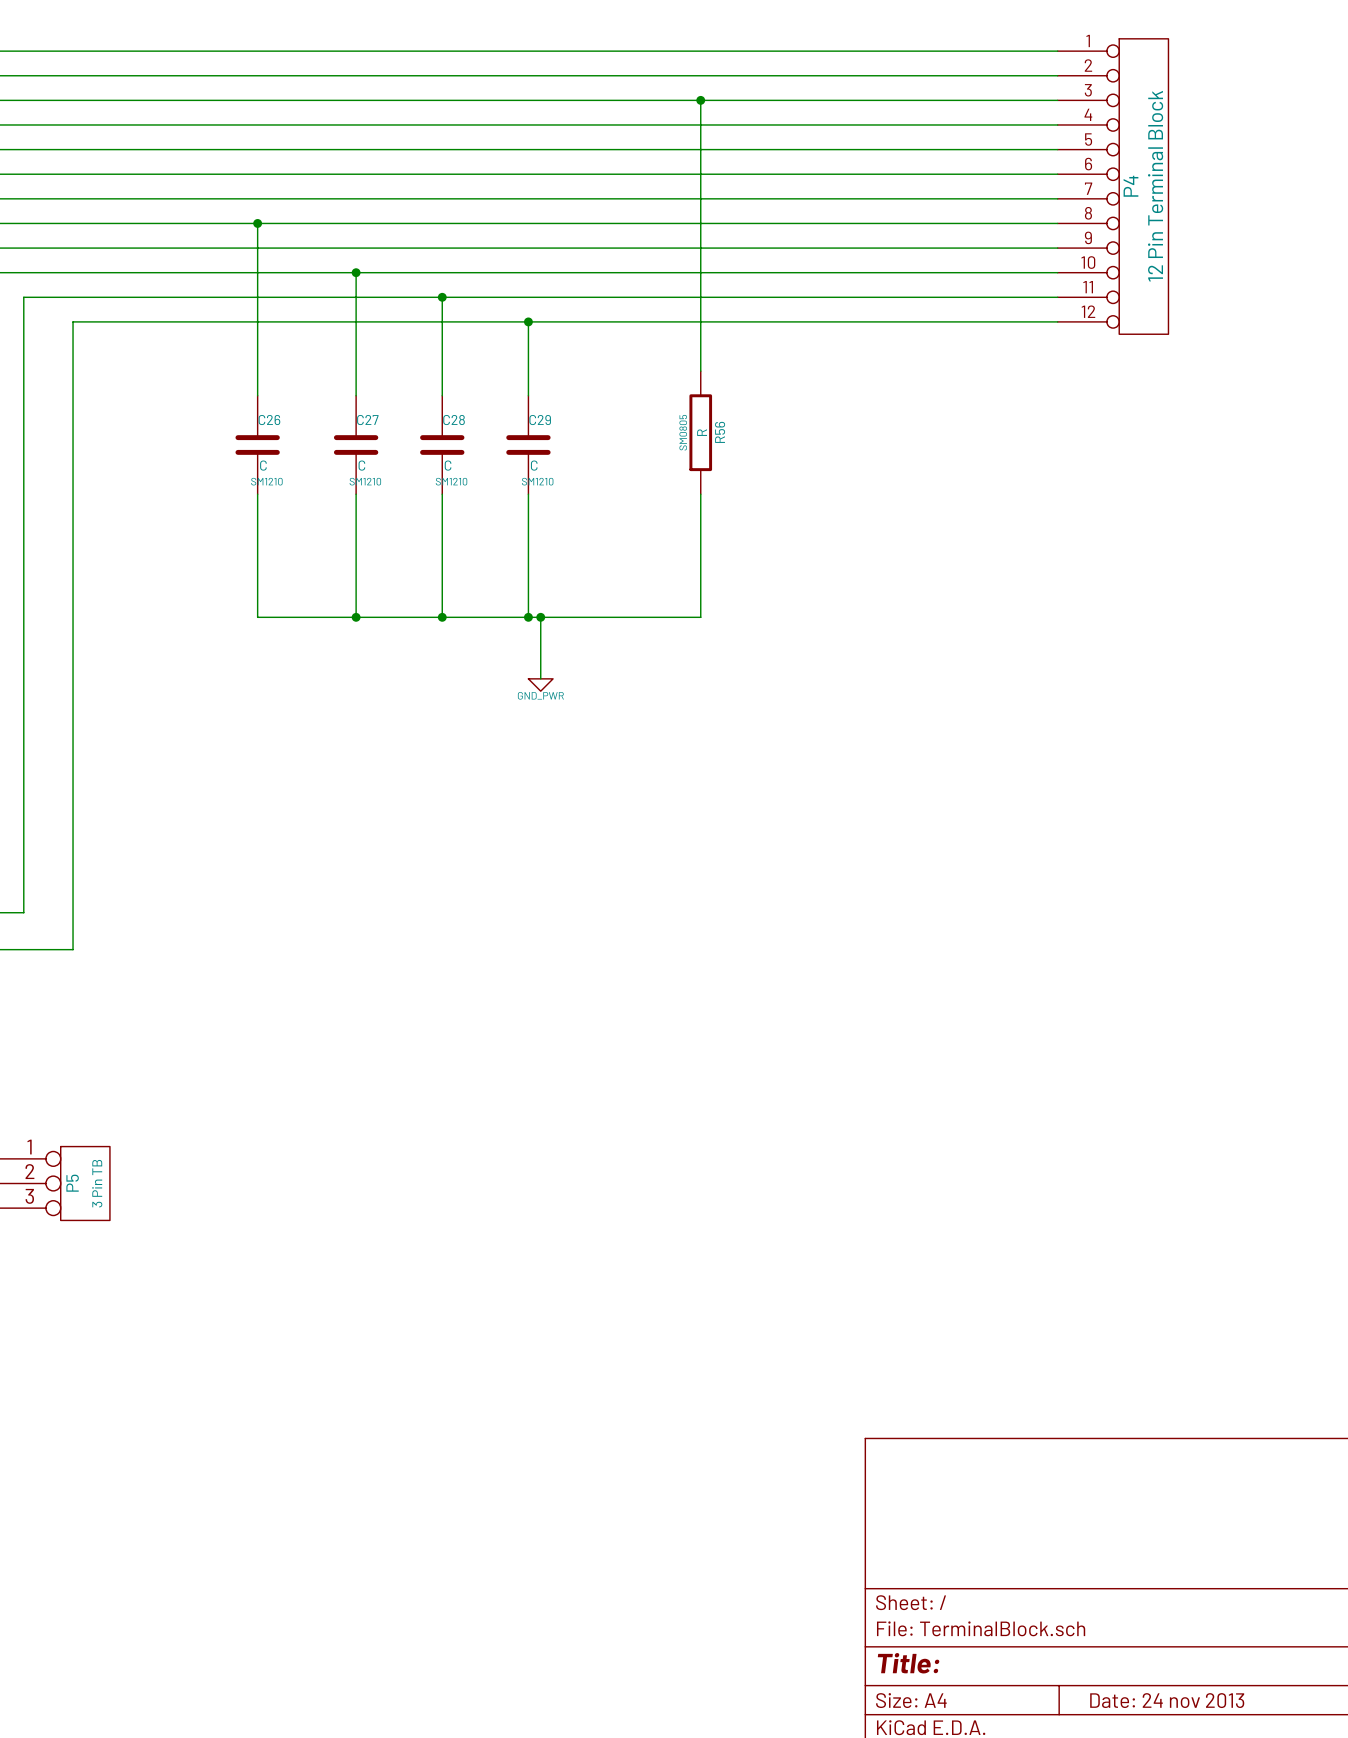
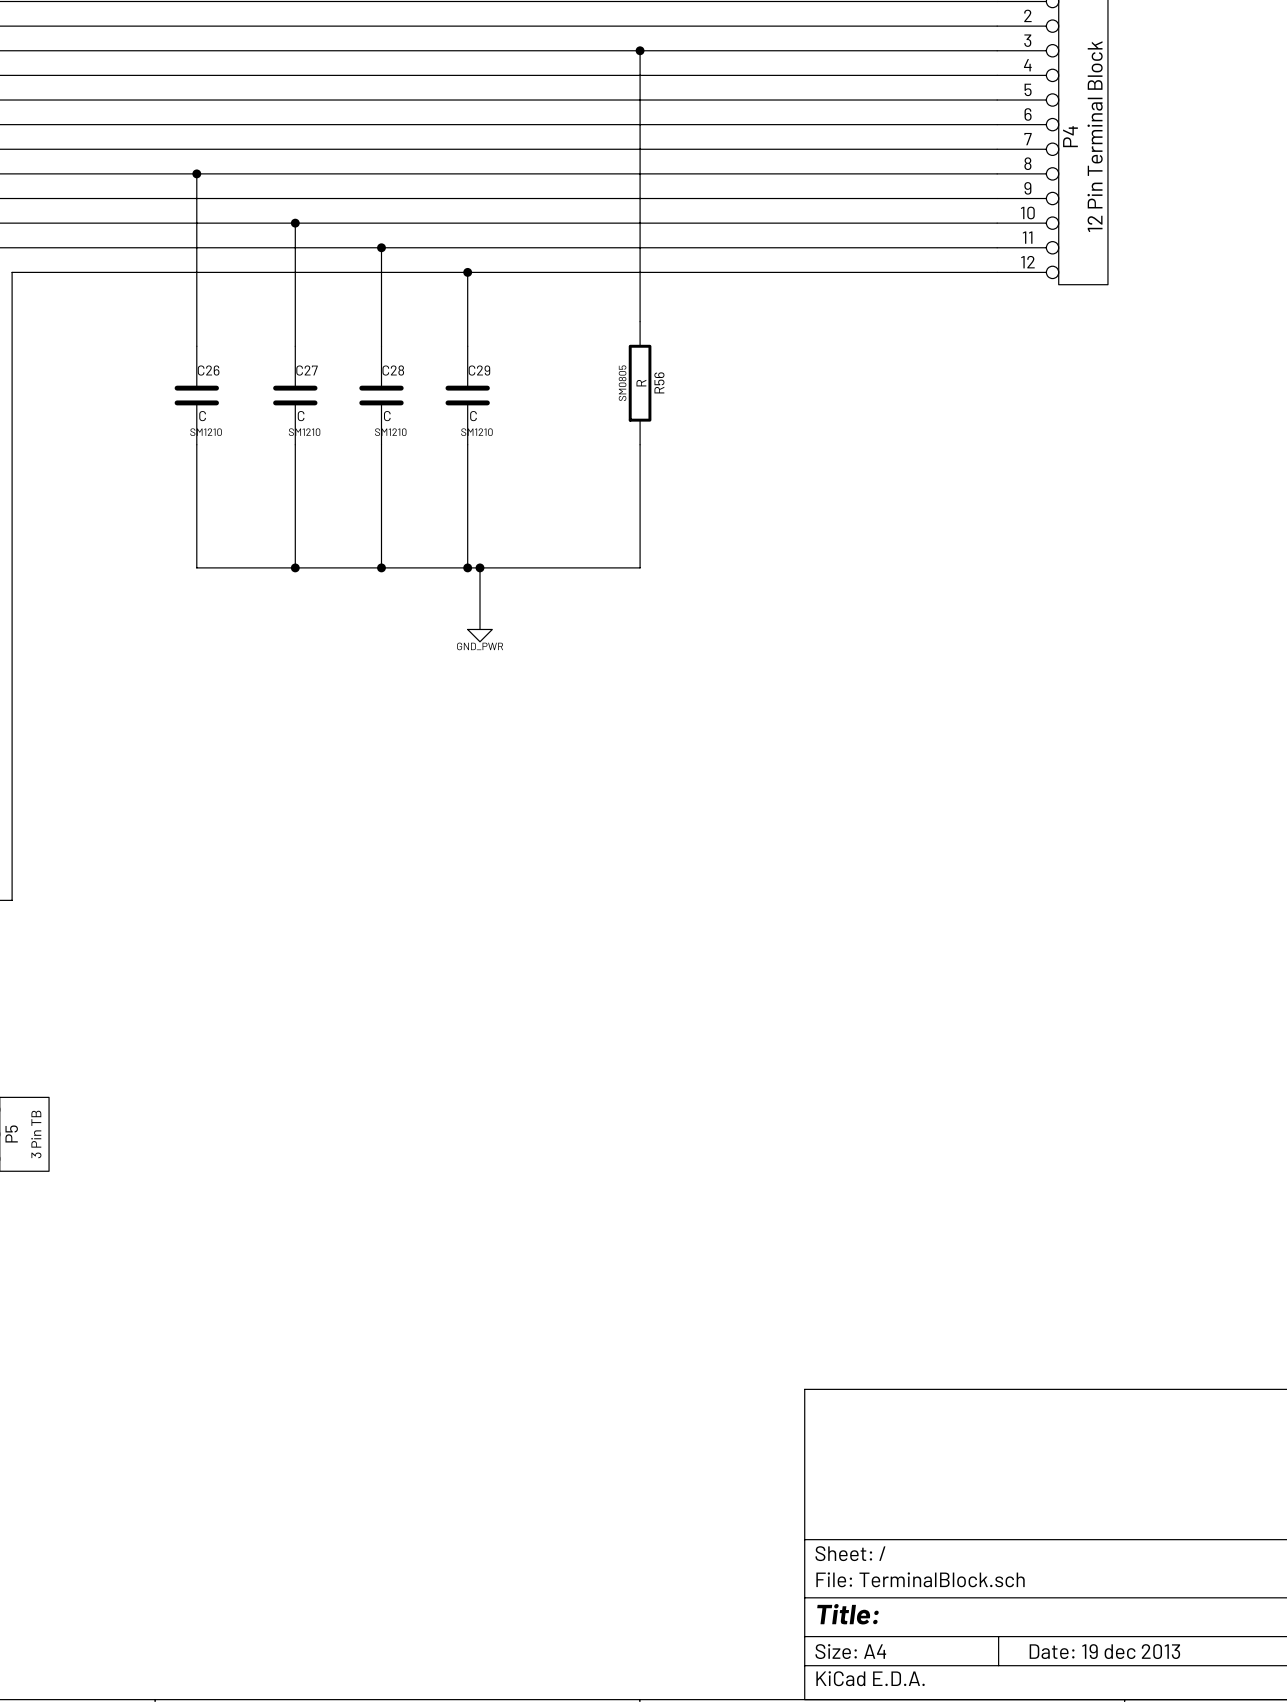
title block: Date: 24 nov 2013 (1167, 1700) -> Date: 19 dec 2013 (1104, 1651)

